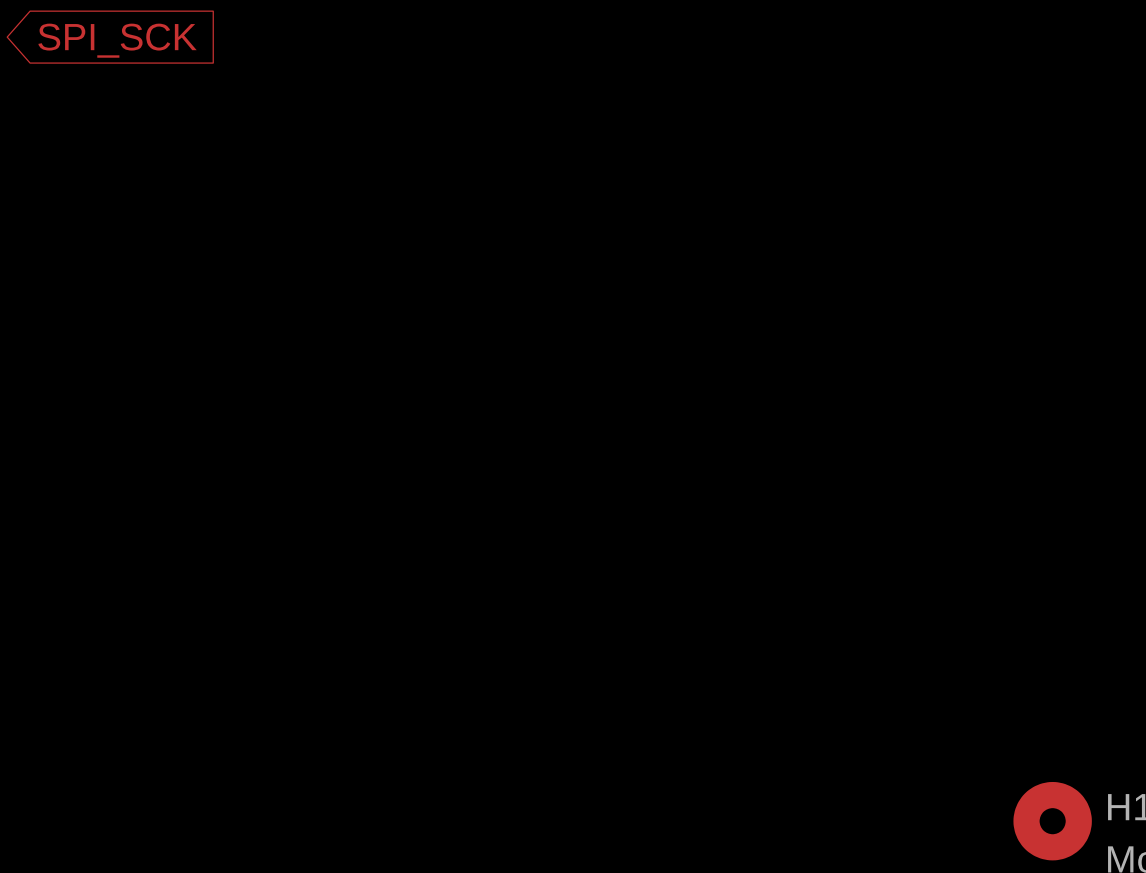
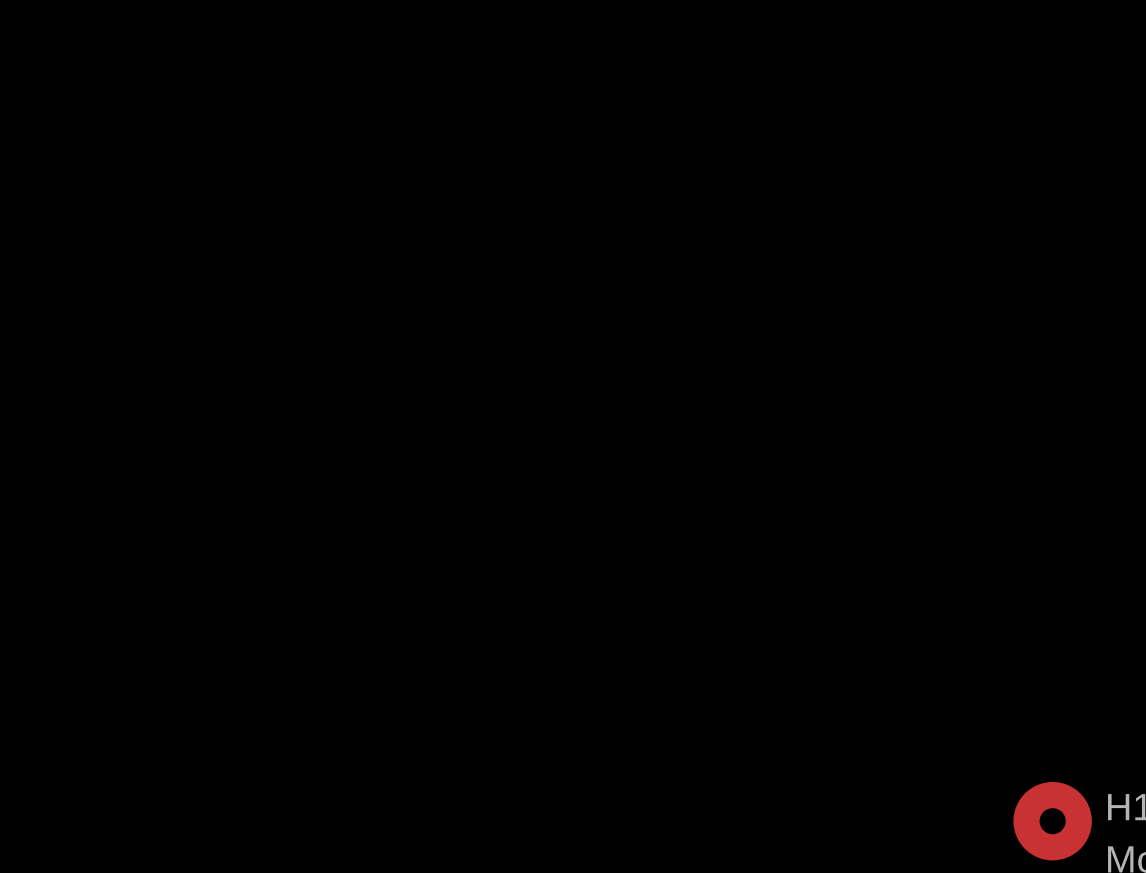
global label: SPI_SCK (117, 40) -> none

